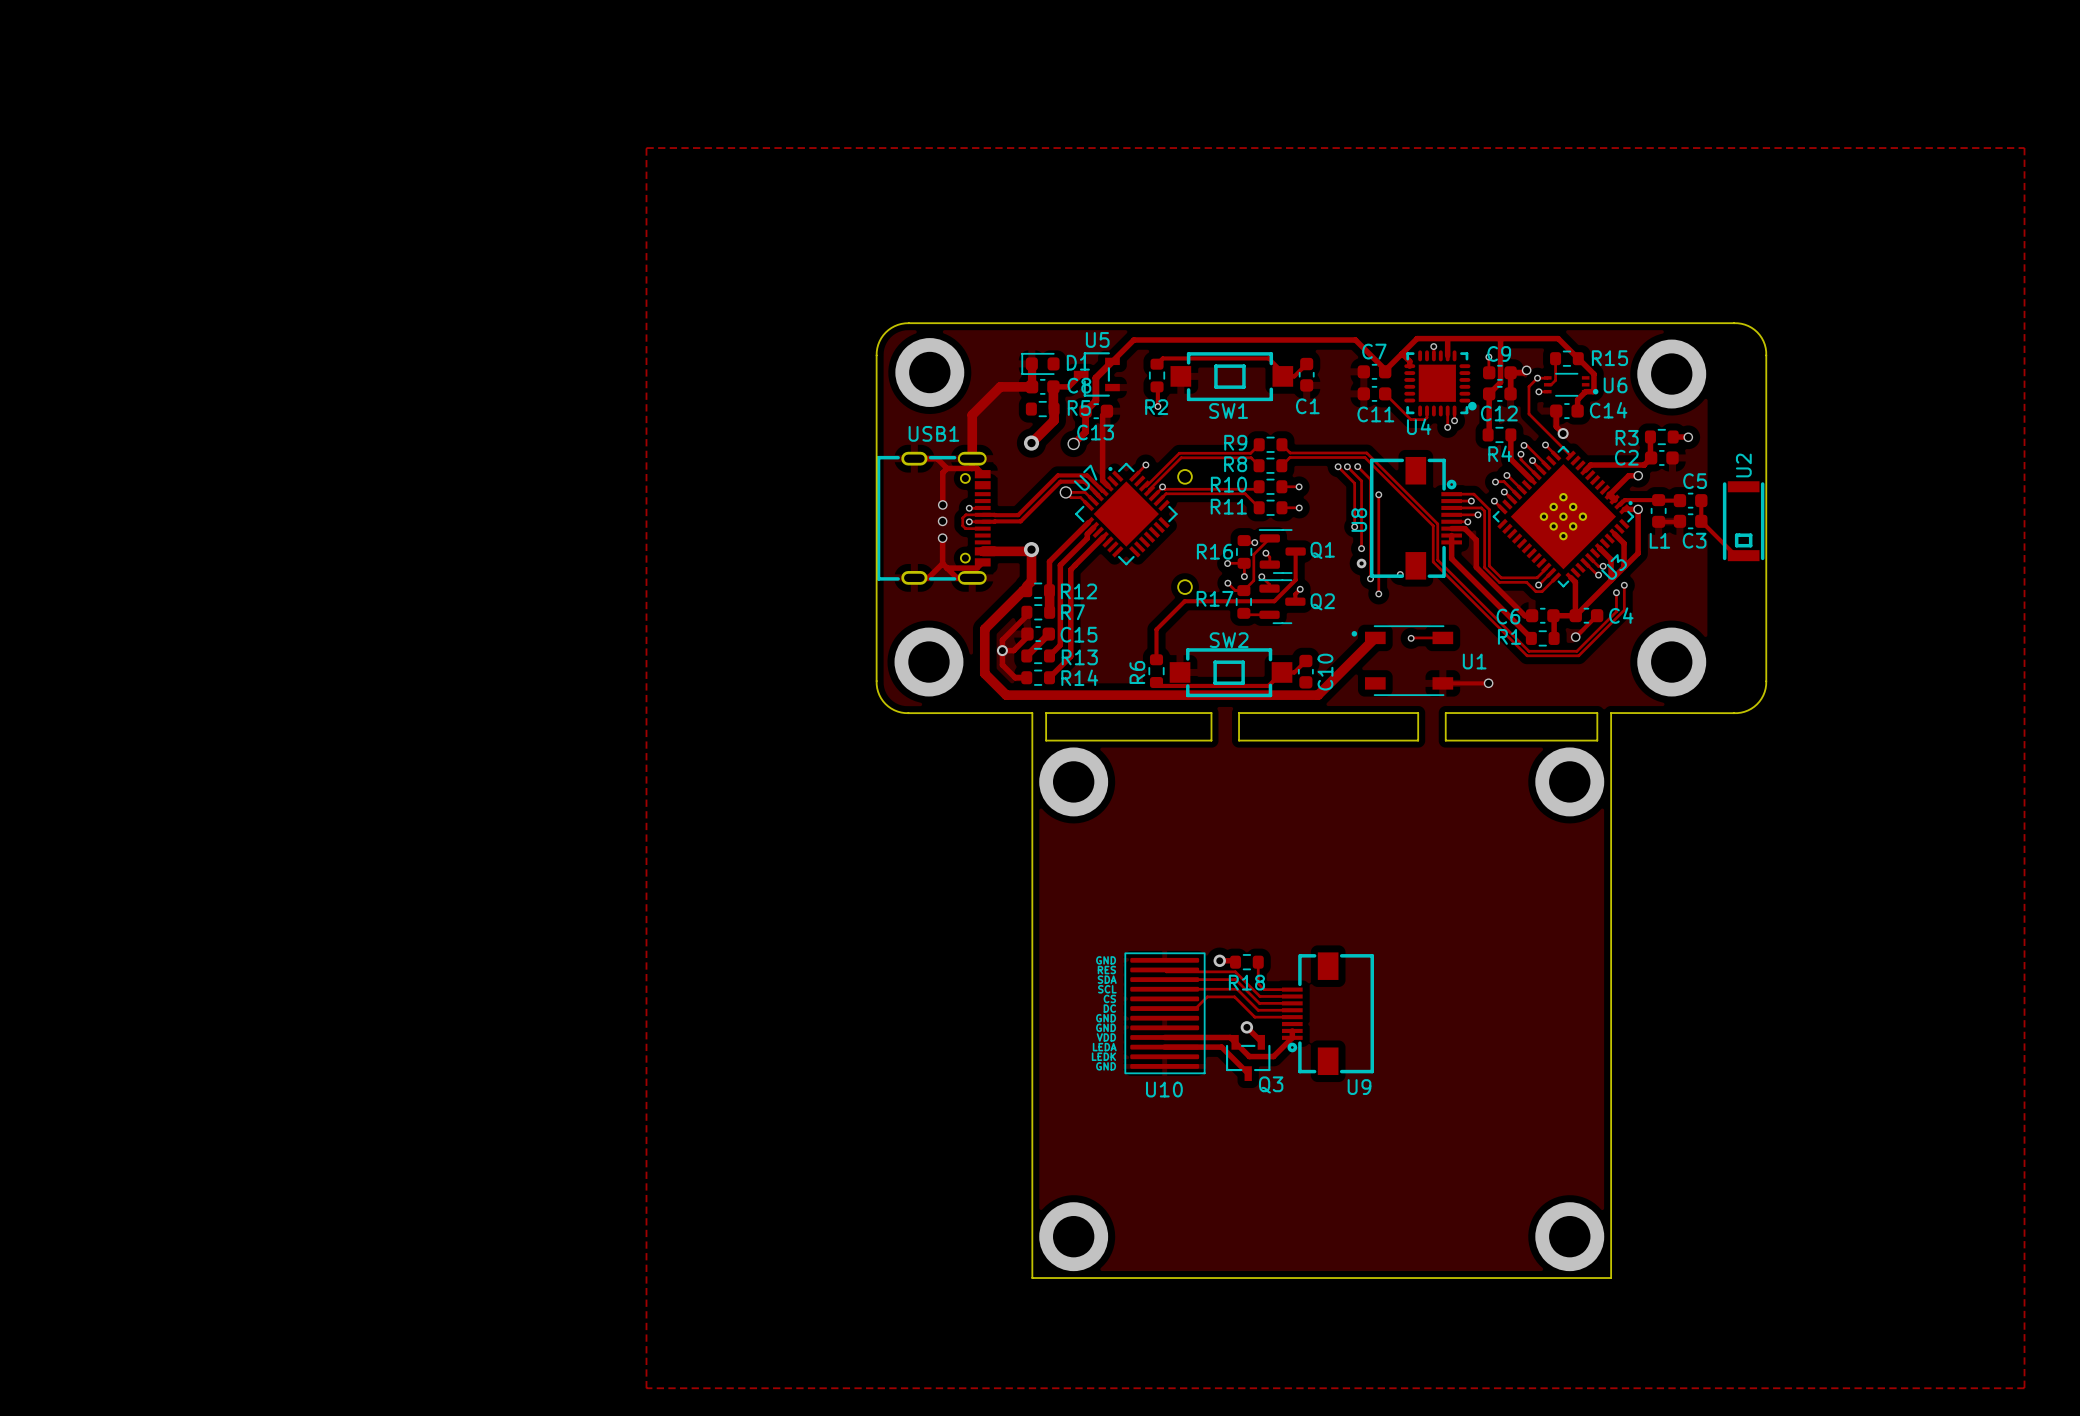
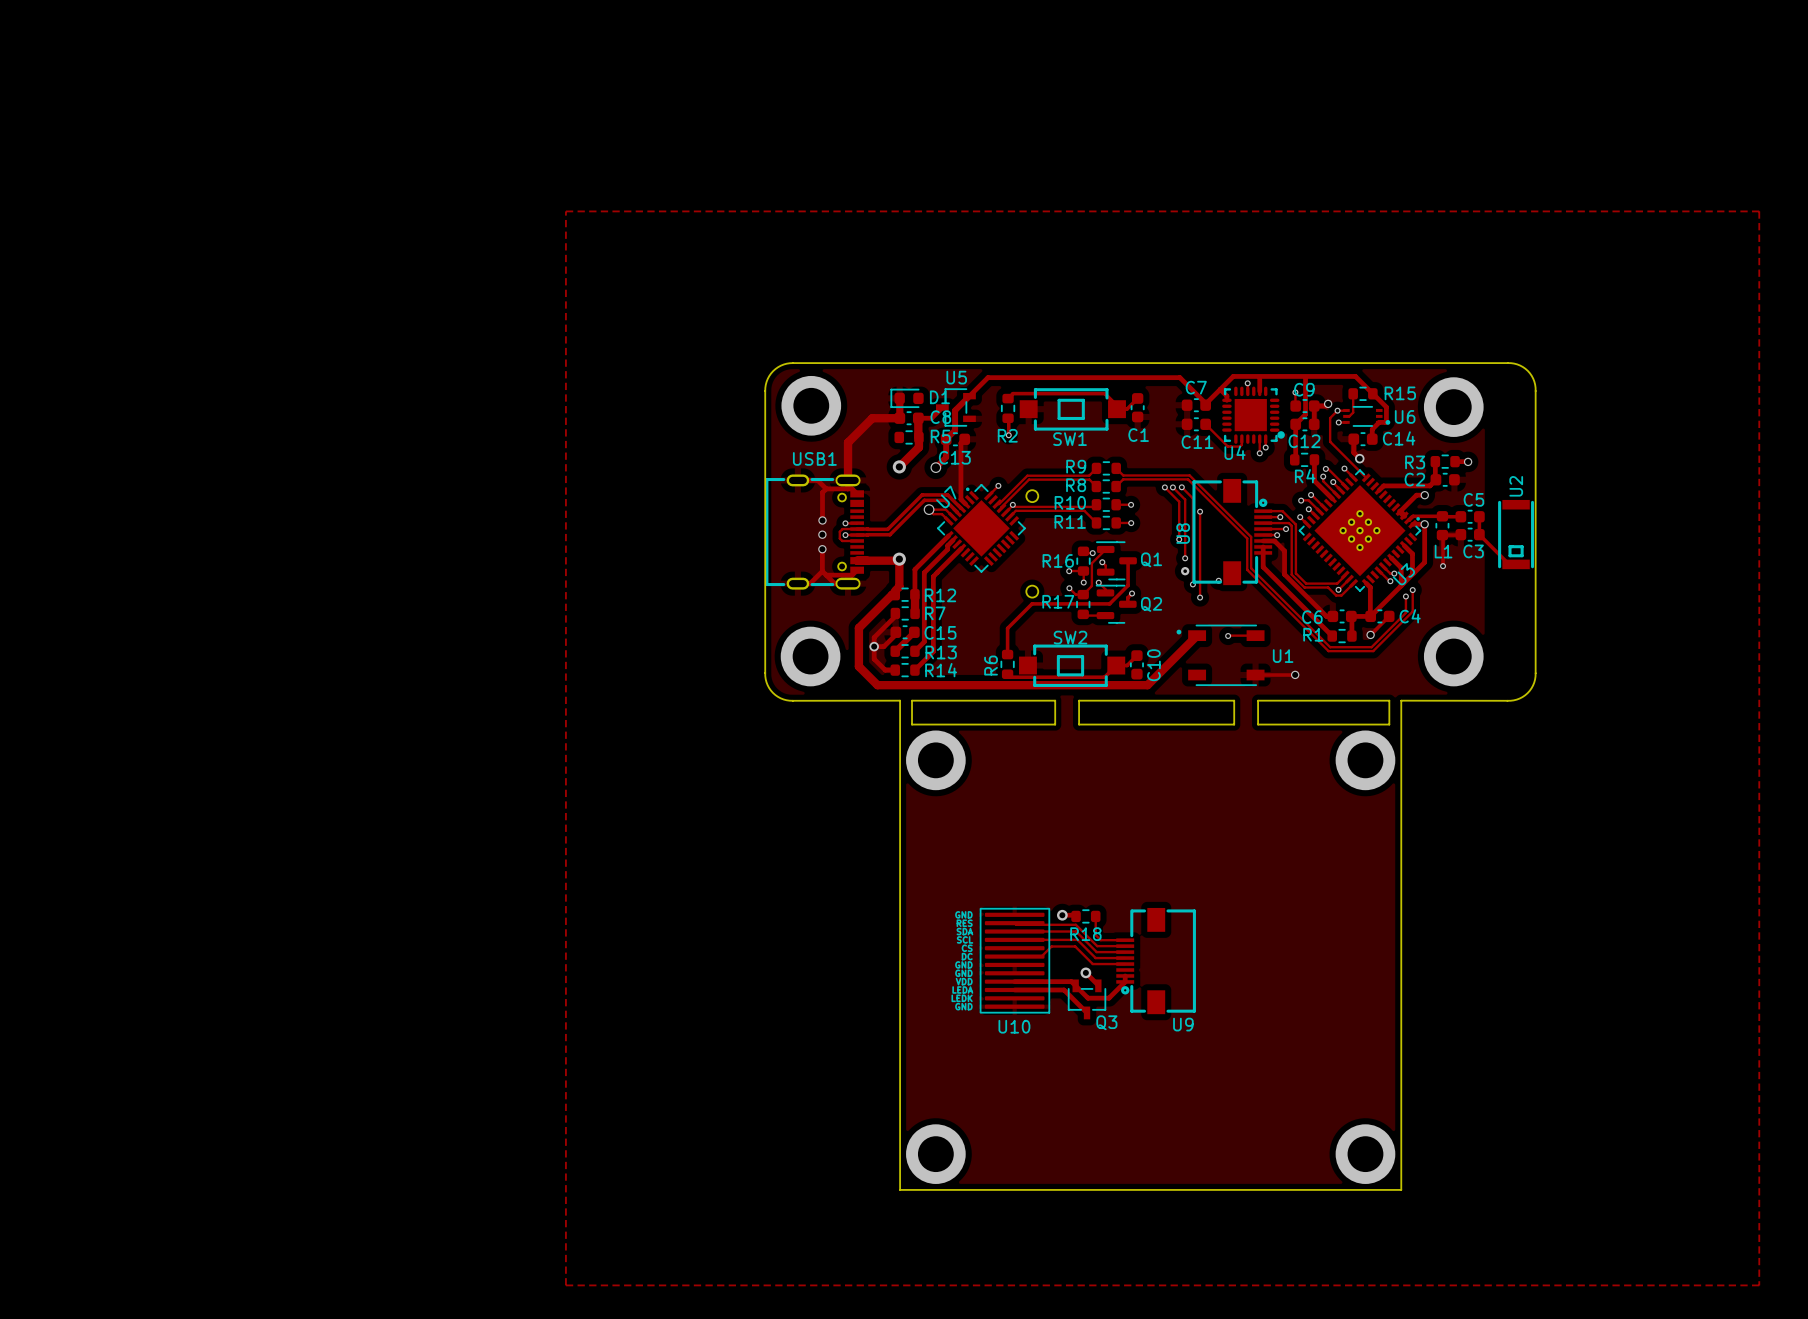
track: none -> (1442, 535) (1443, 566)
via: none -> (1443, 566)

